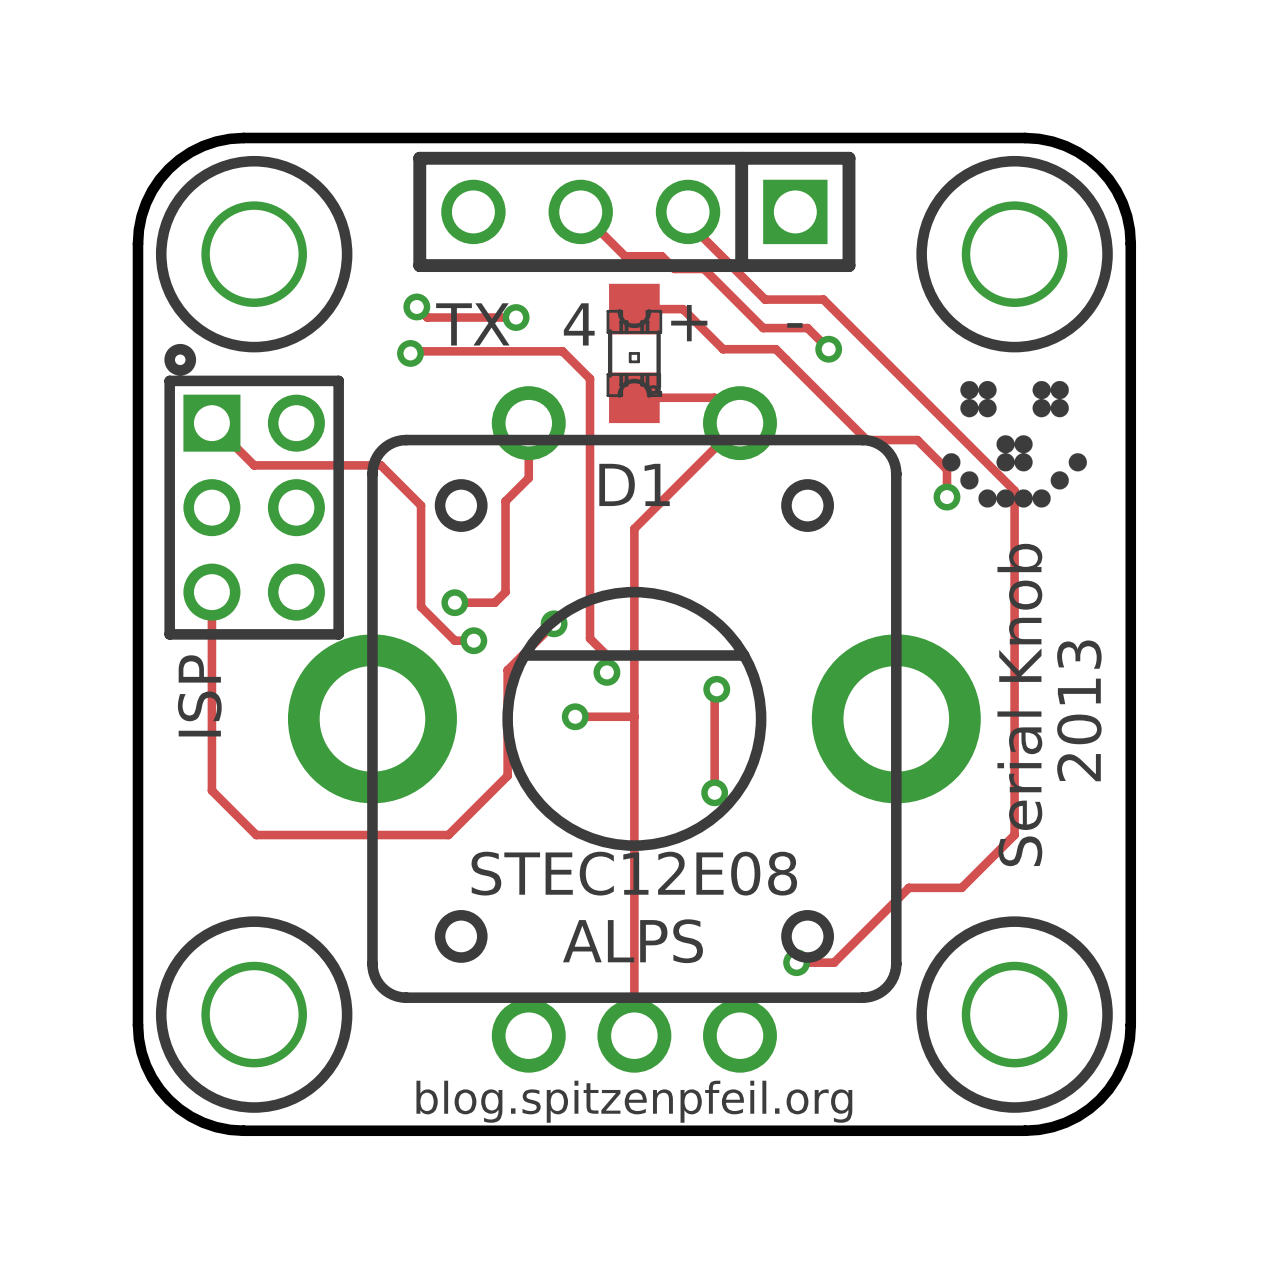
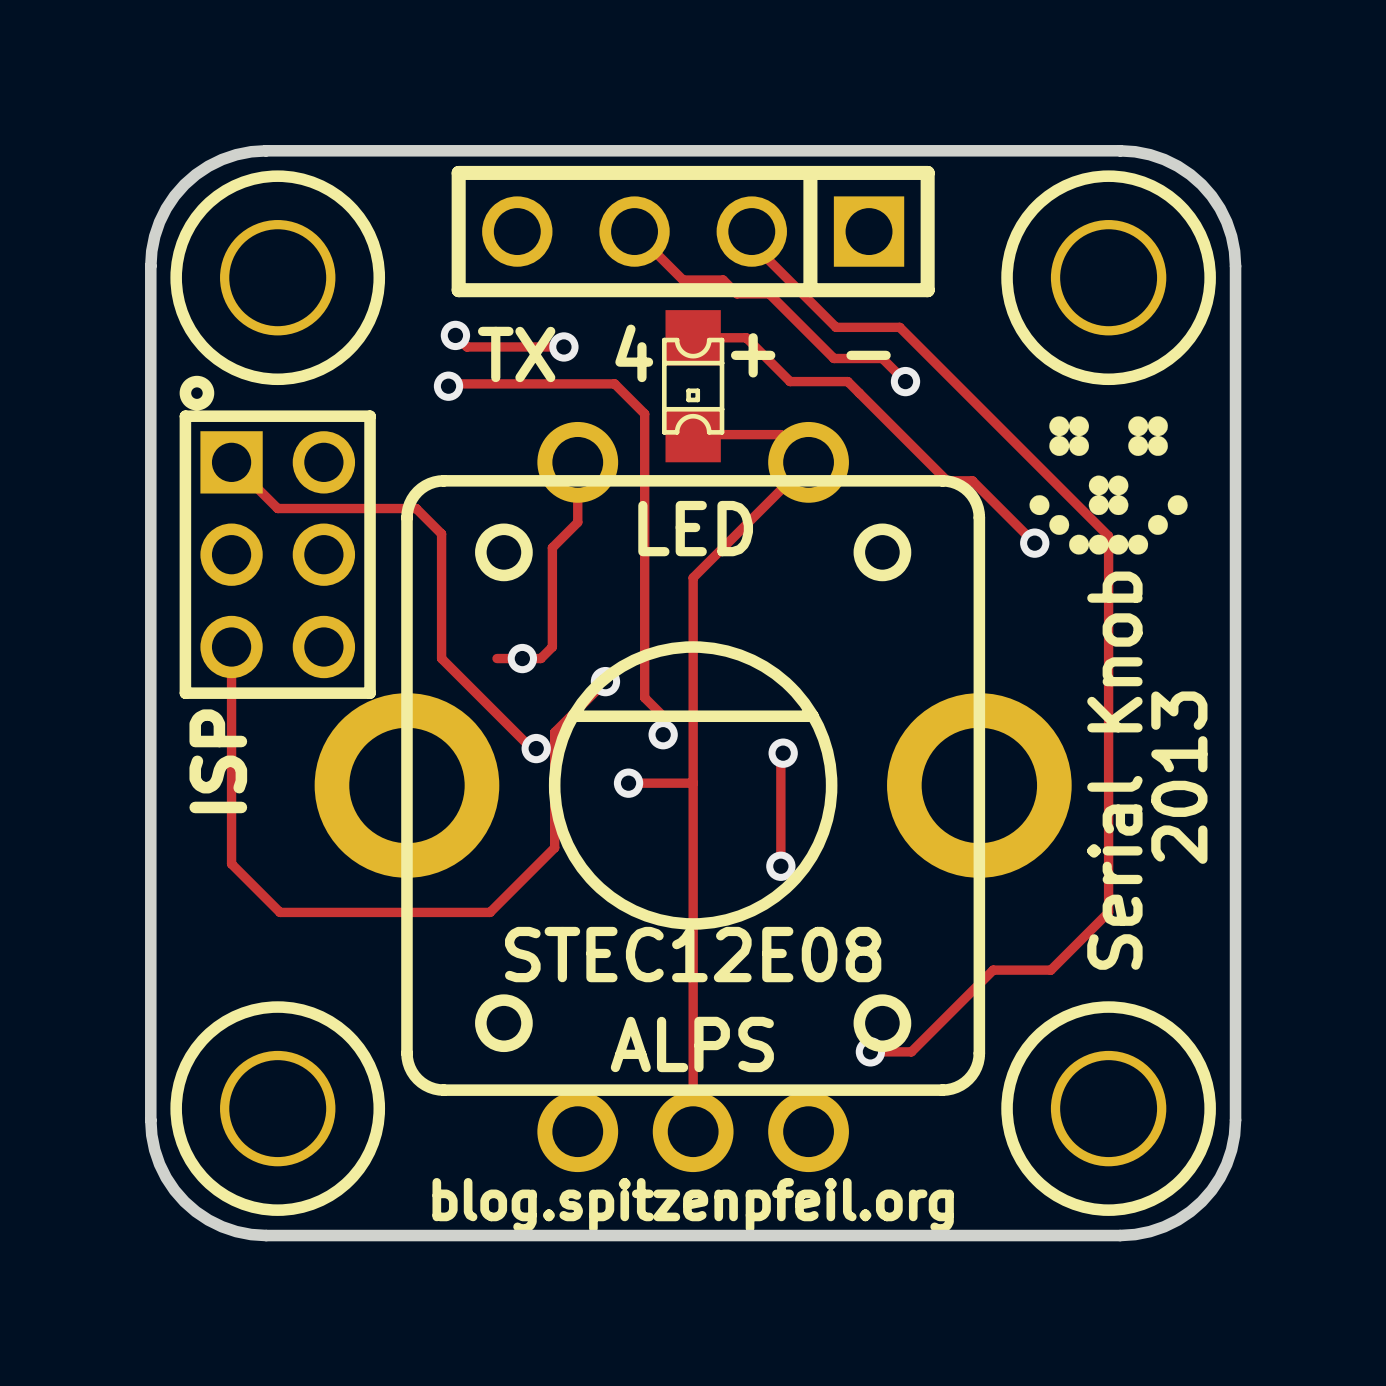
D1: (634, 353) -> none
part: none -> LED (693, 386)
track: (889, 440) (917, 440) (946, 469) (946, 497) -> (972, 480) (1034, 543)
track: (404, 488) (421, 505) (421, 606) (454, 640) (473, 640) -> (441, 533) (441, 658) (531, 748) (536, 748)
via position: (454, 602) -> (522, 658)
via: (473, 640) -> none
via: none -> (536, 748)
text position: ALPS (632, 941) -> ALPS (692, 1044)

